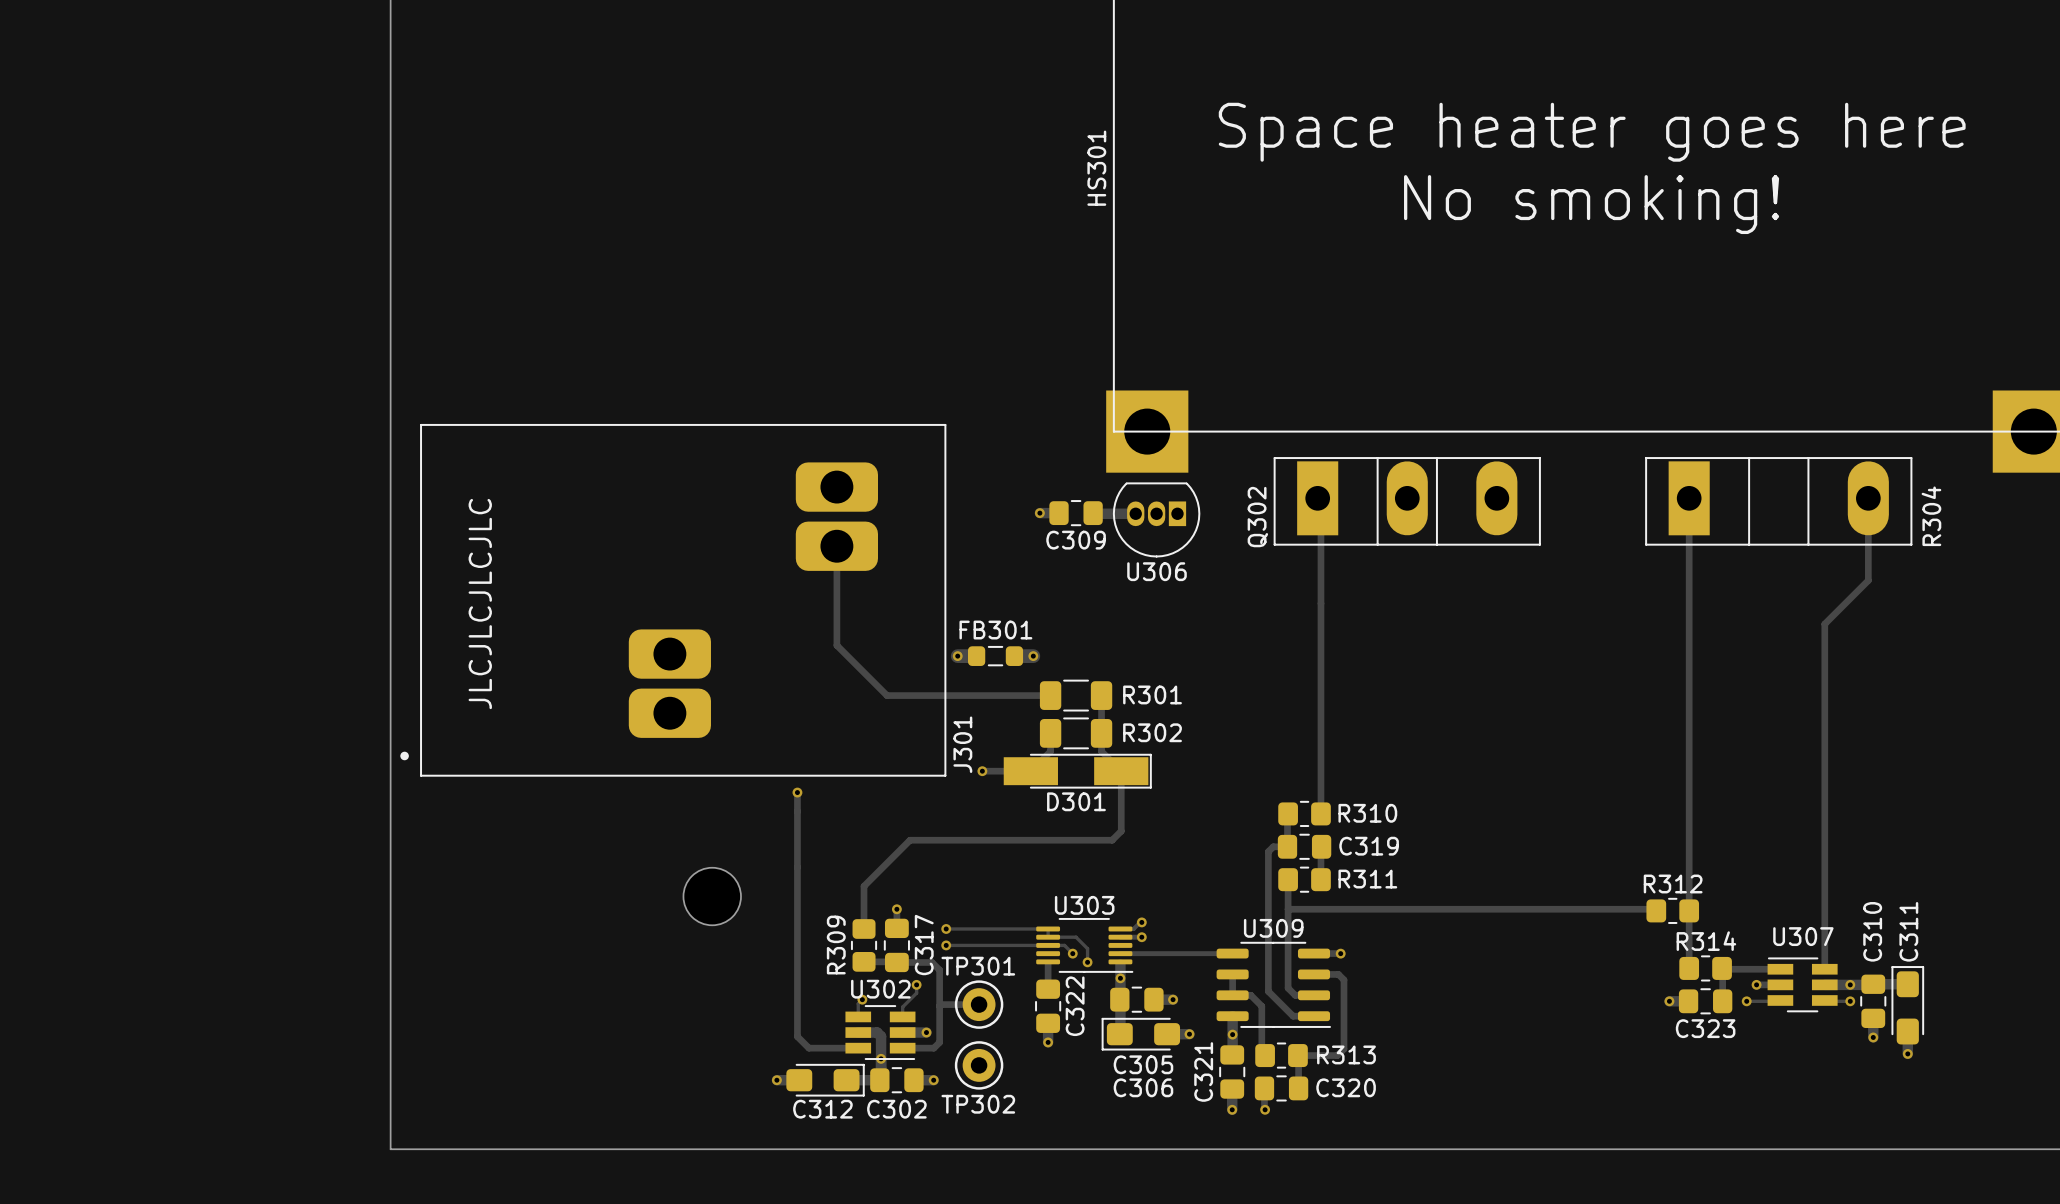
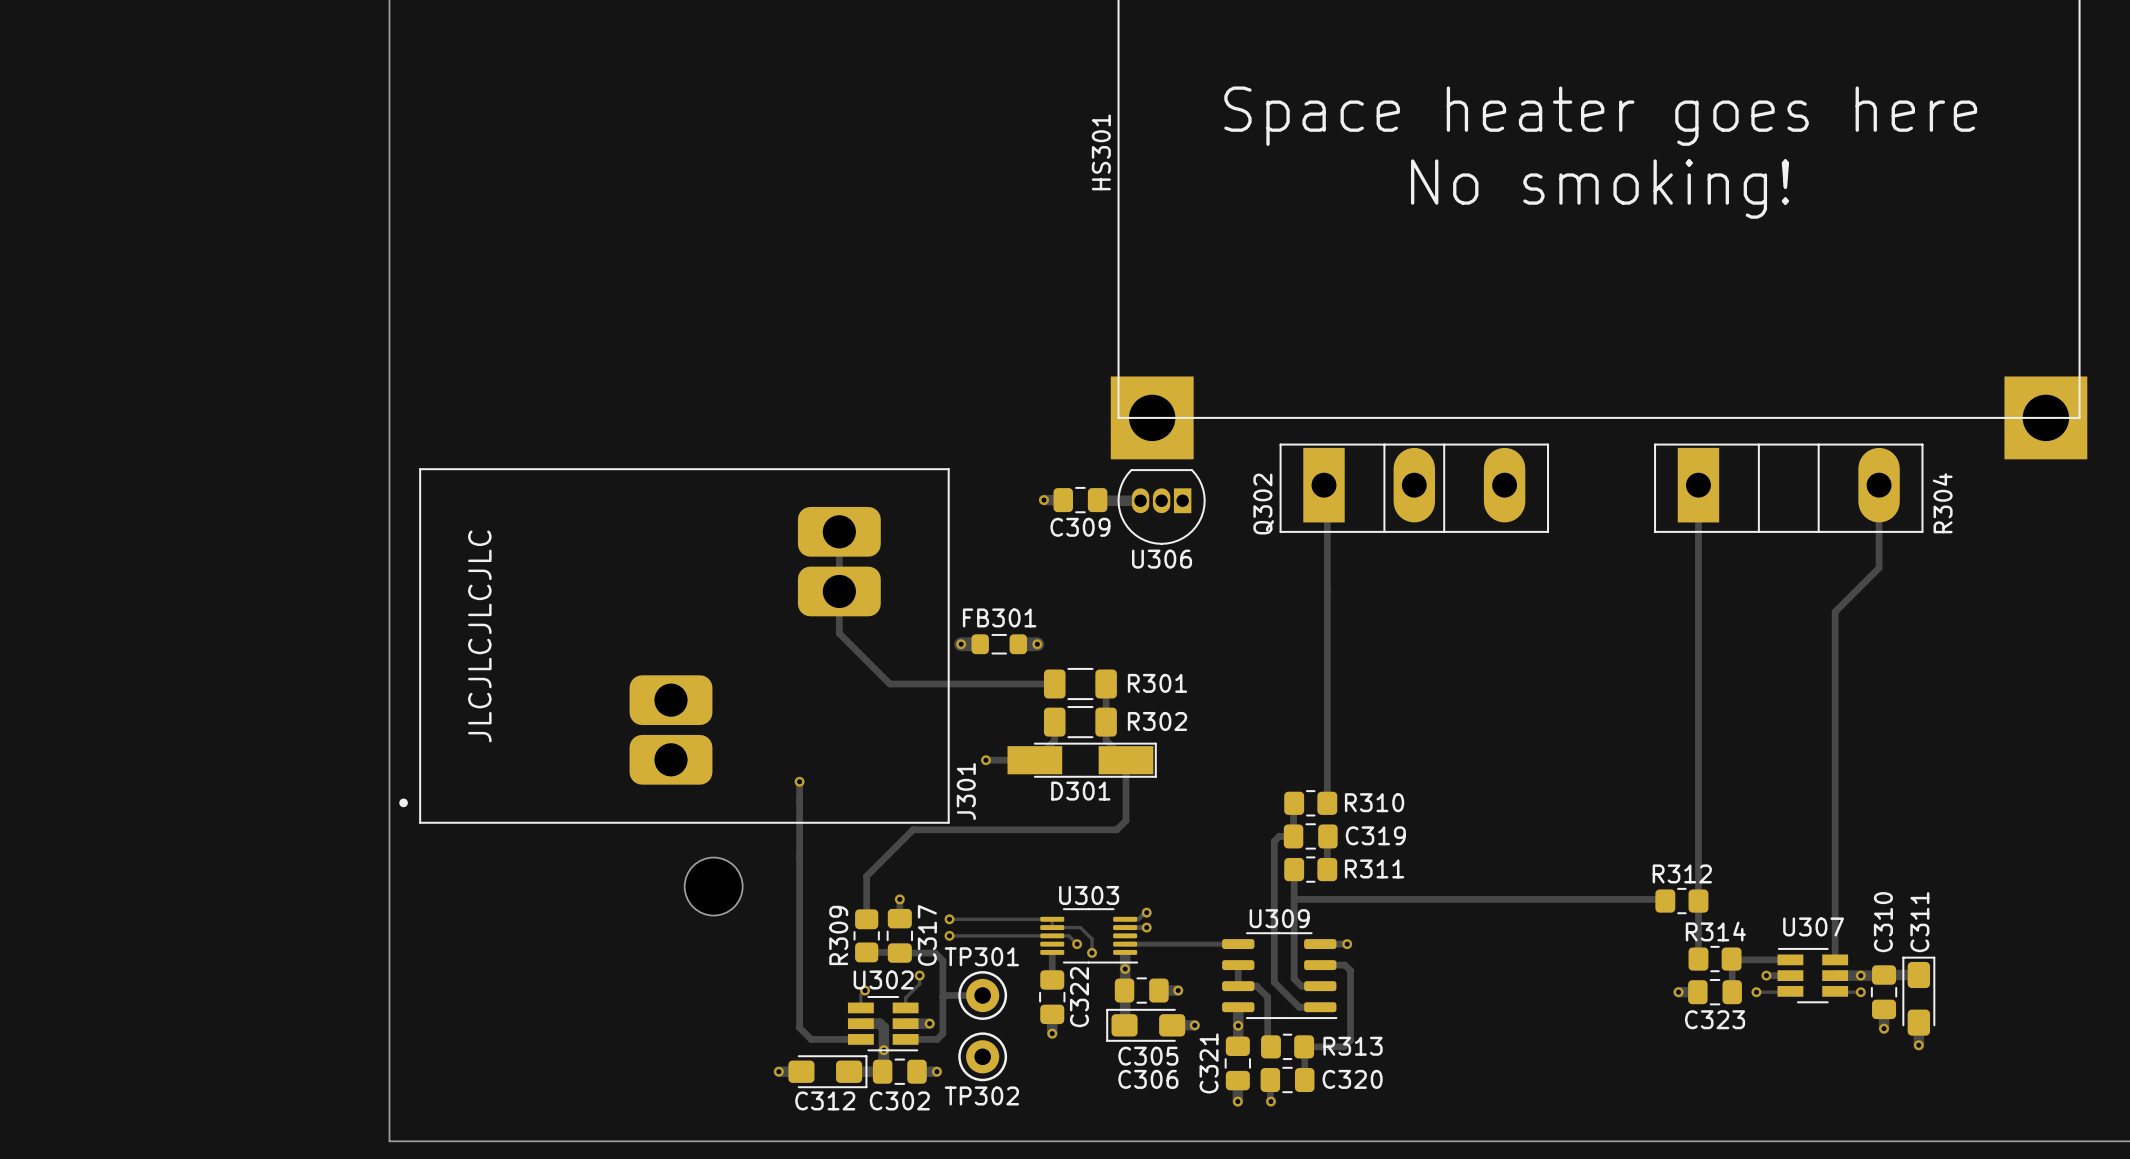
J301 position: (673, 600) -> (674, 645)
text position: JLCJLCJLCJLC (480, 604) -> JLCJLCJLCJLC (479, 636)

